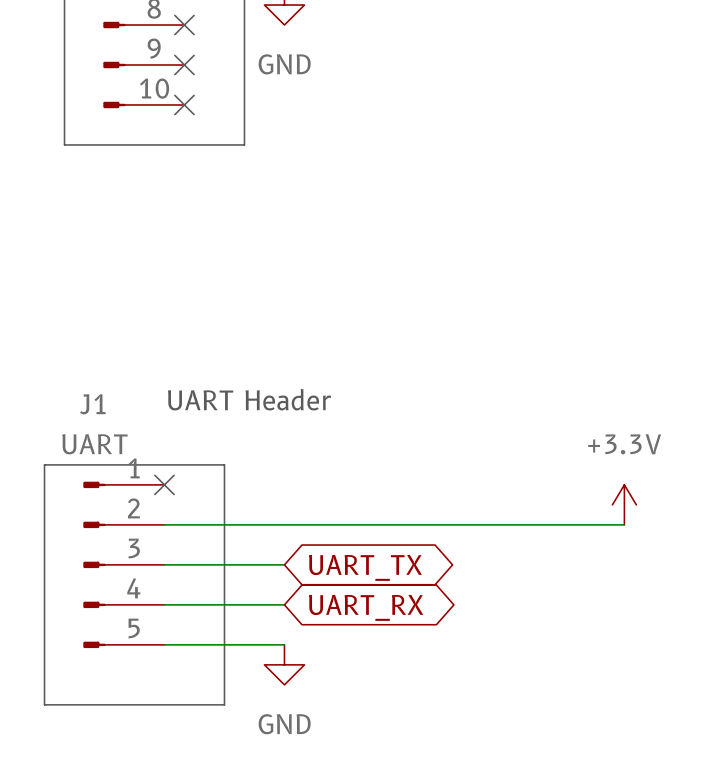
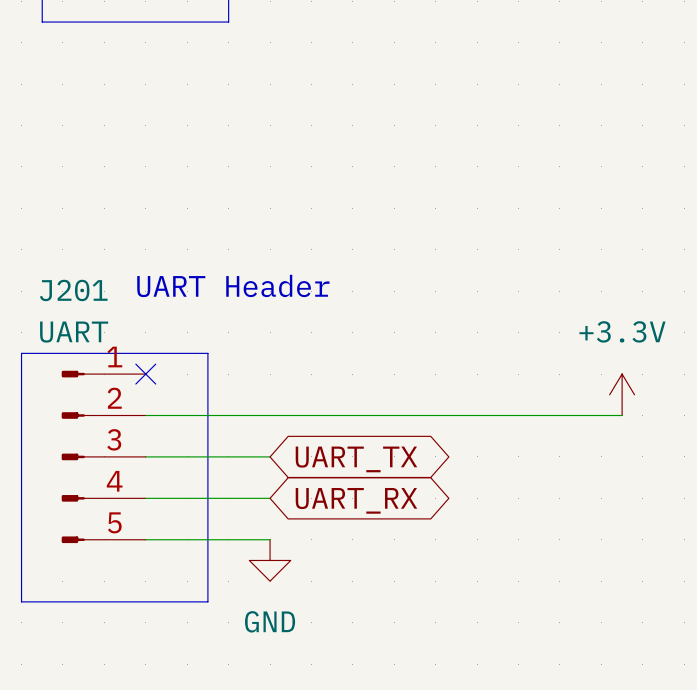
J1 name: J1 (92, 404) -> J201 (73, 290)

